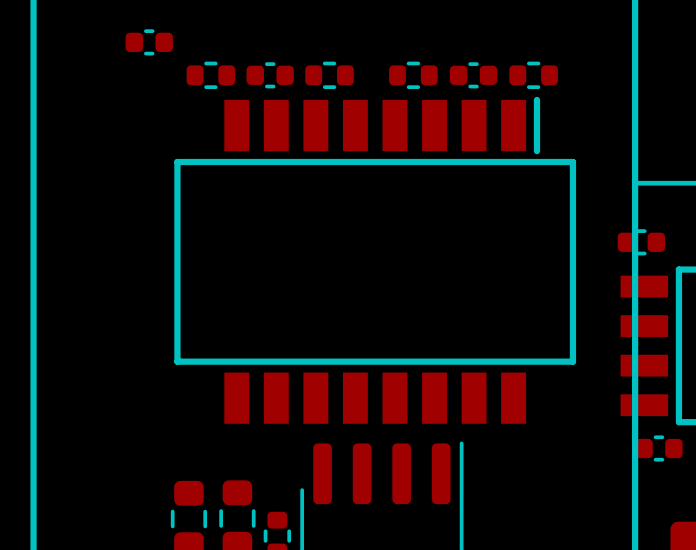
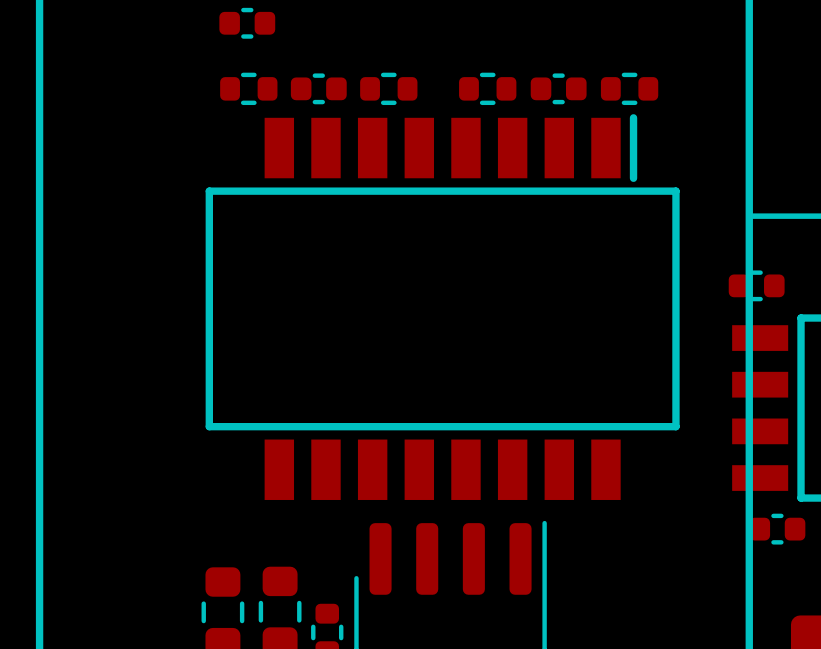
part position: (149, 42) -> (247, 23)

